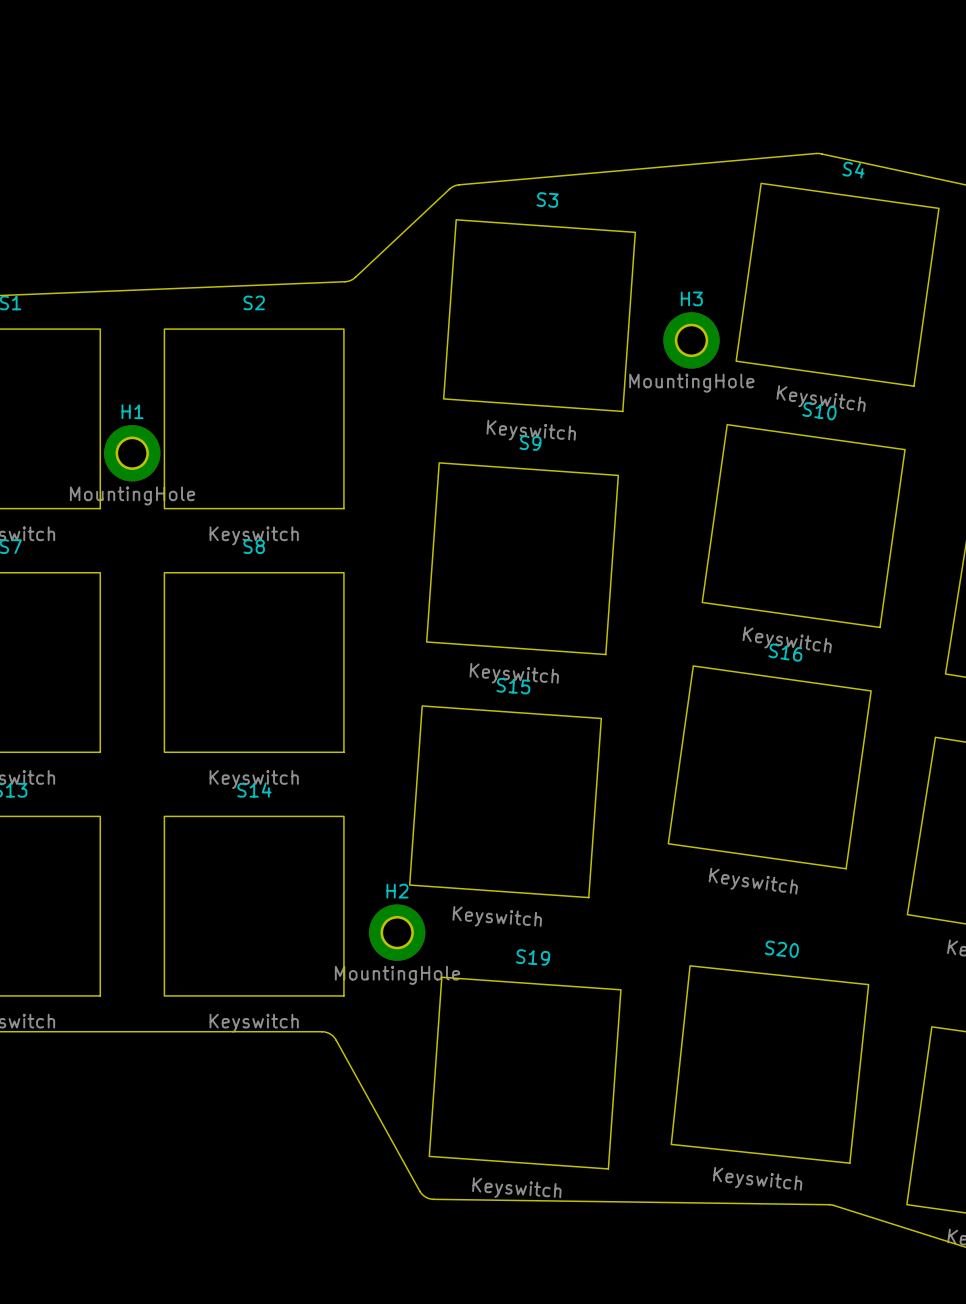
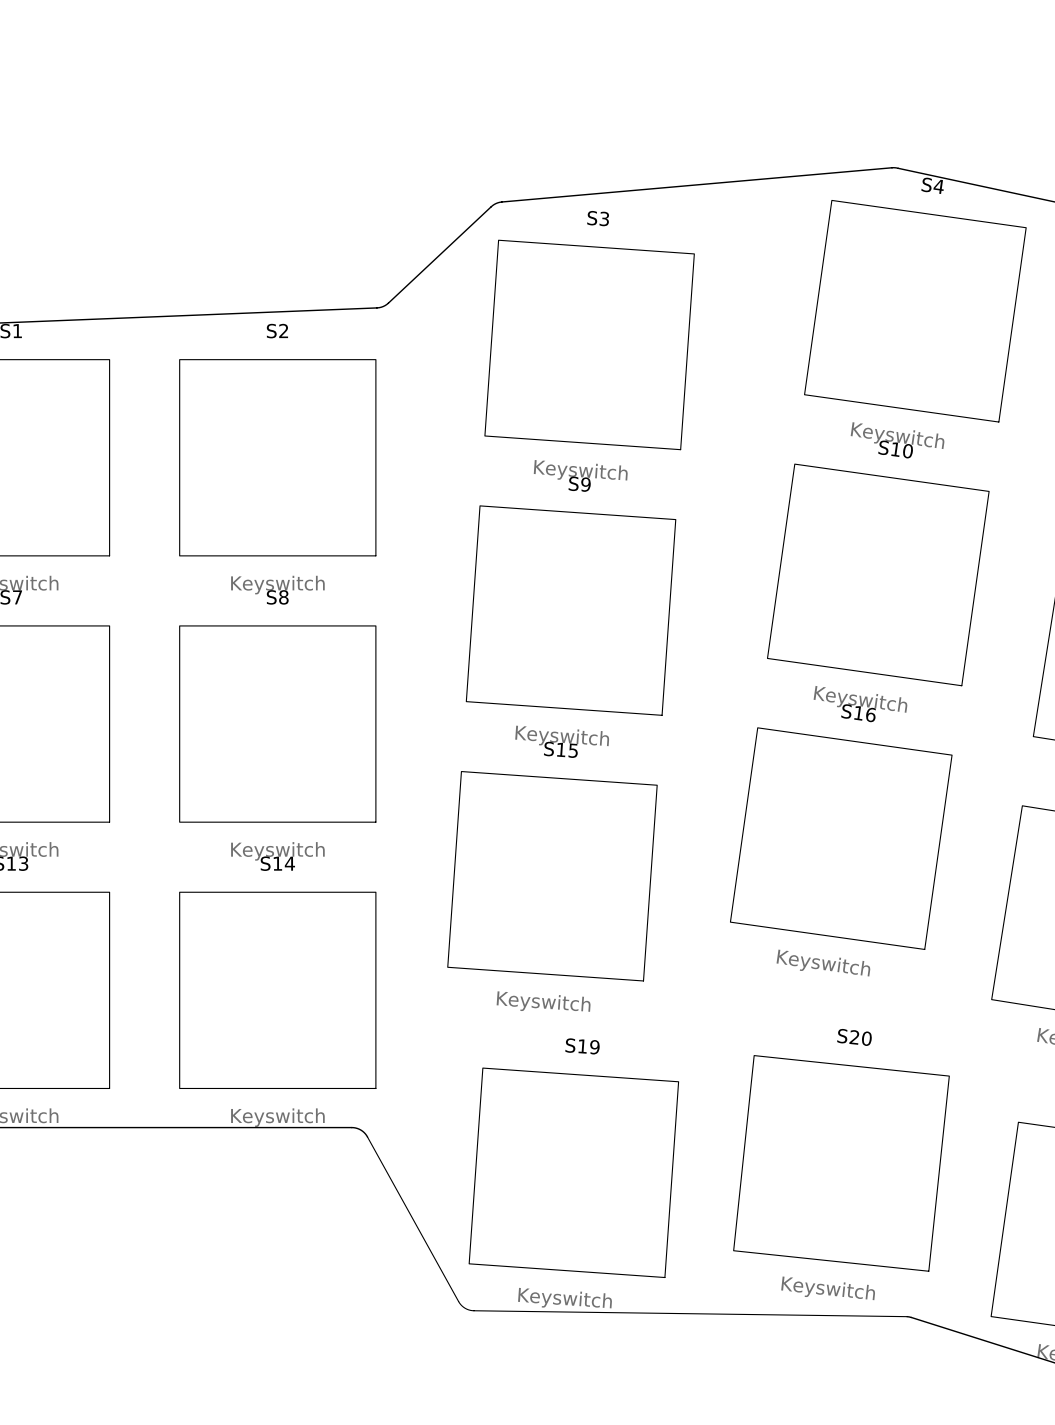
H3: MountingHole (691, 340) -> none
H1: MountingHole (132, 453) -> none
H2: MountingHole (397, 932) -> none

